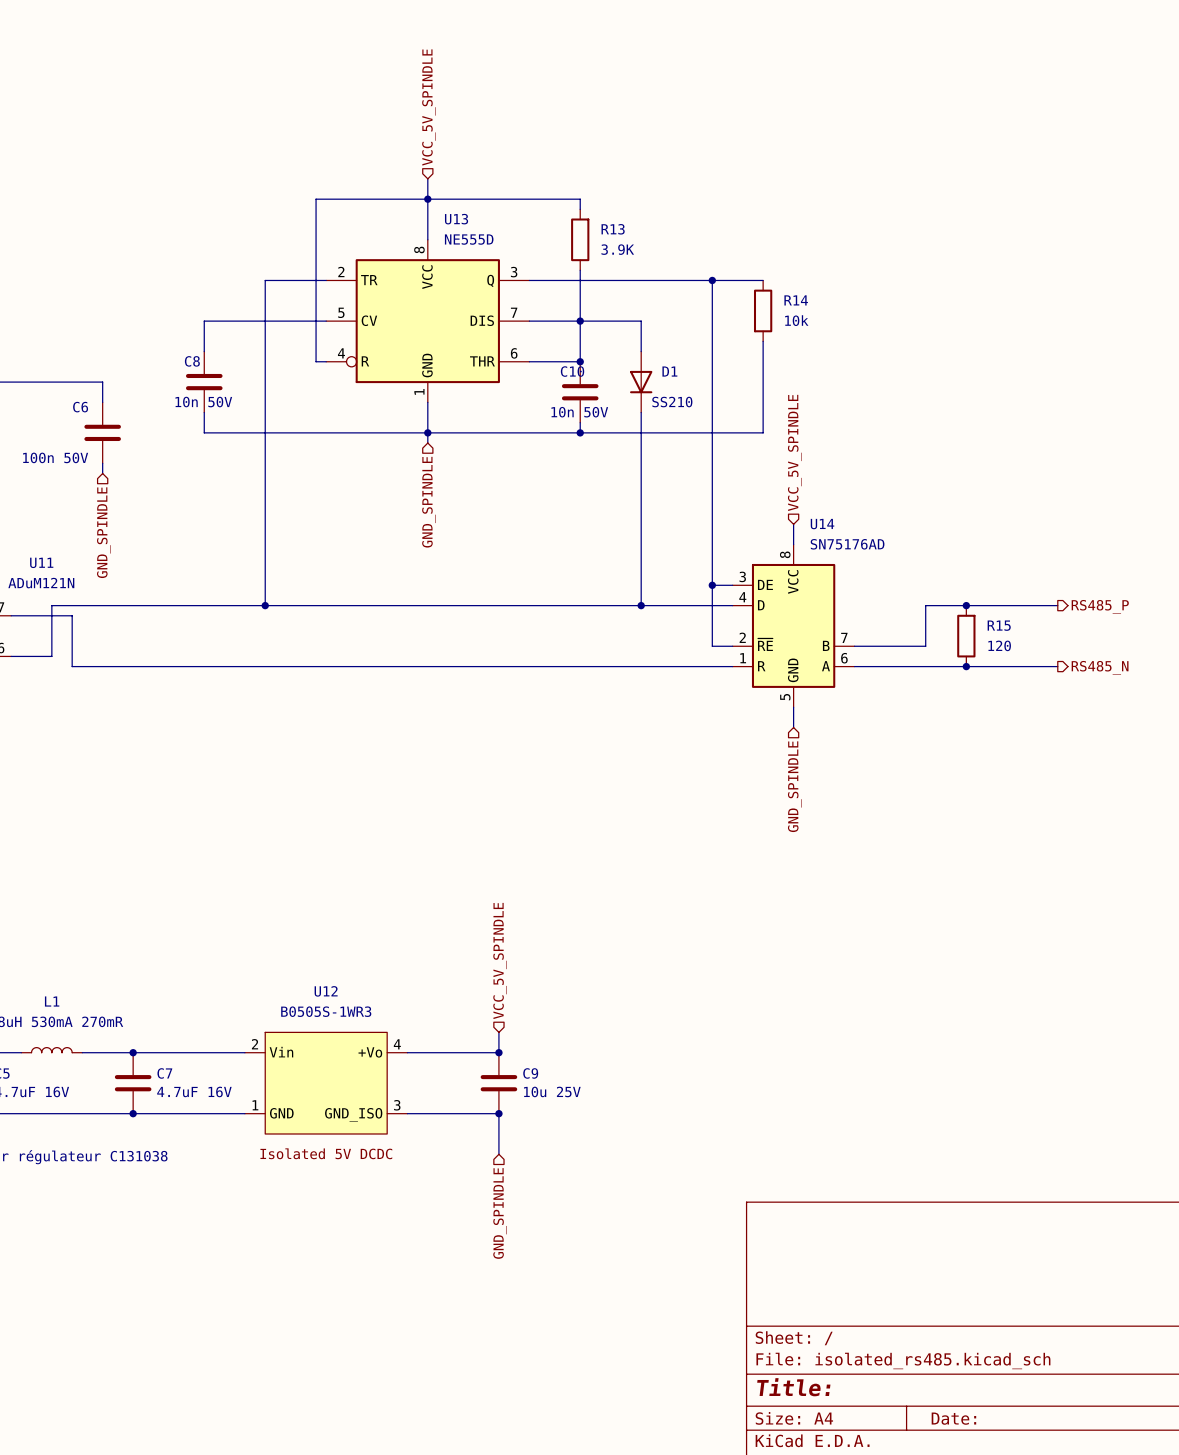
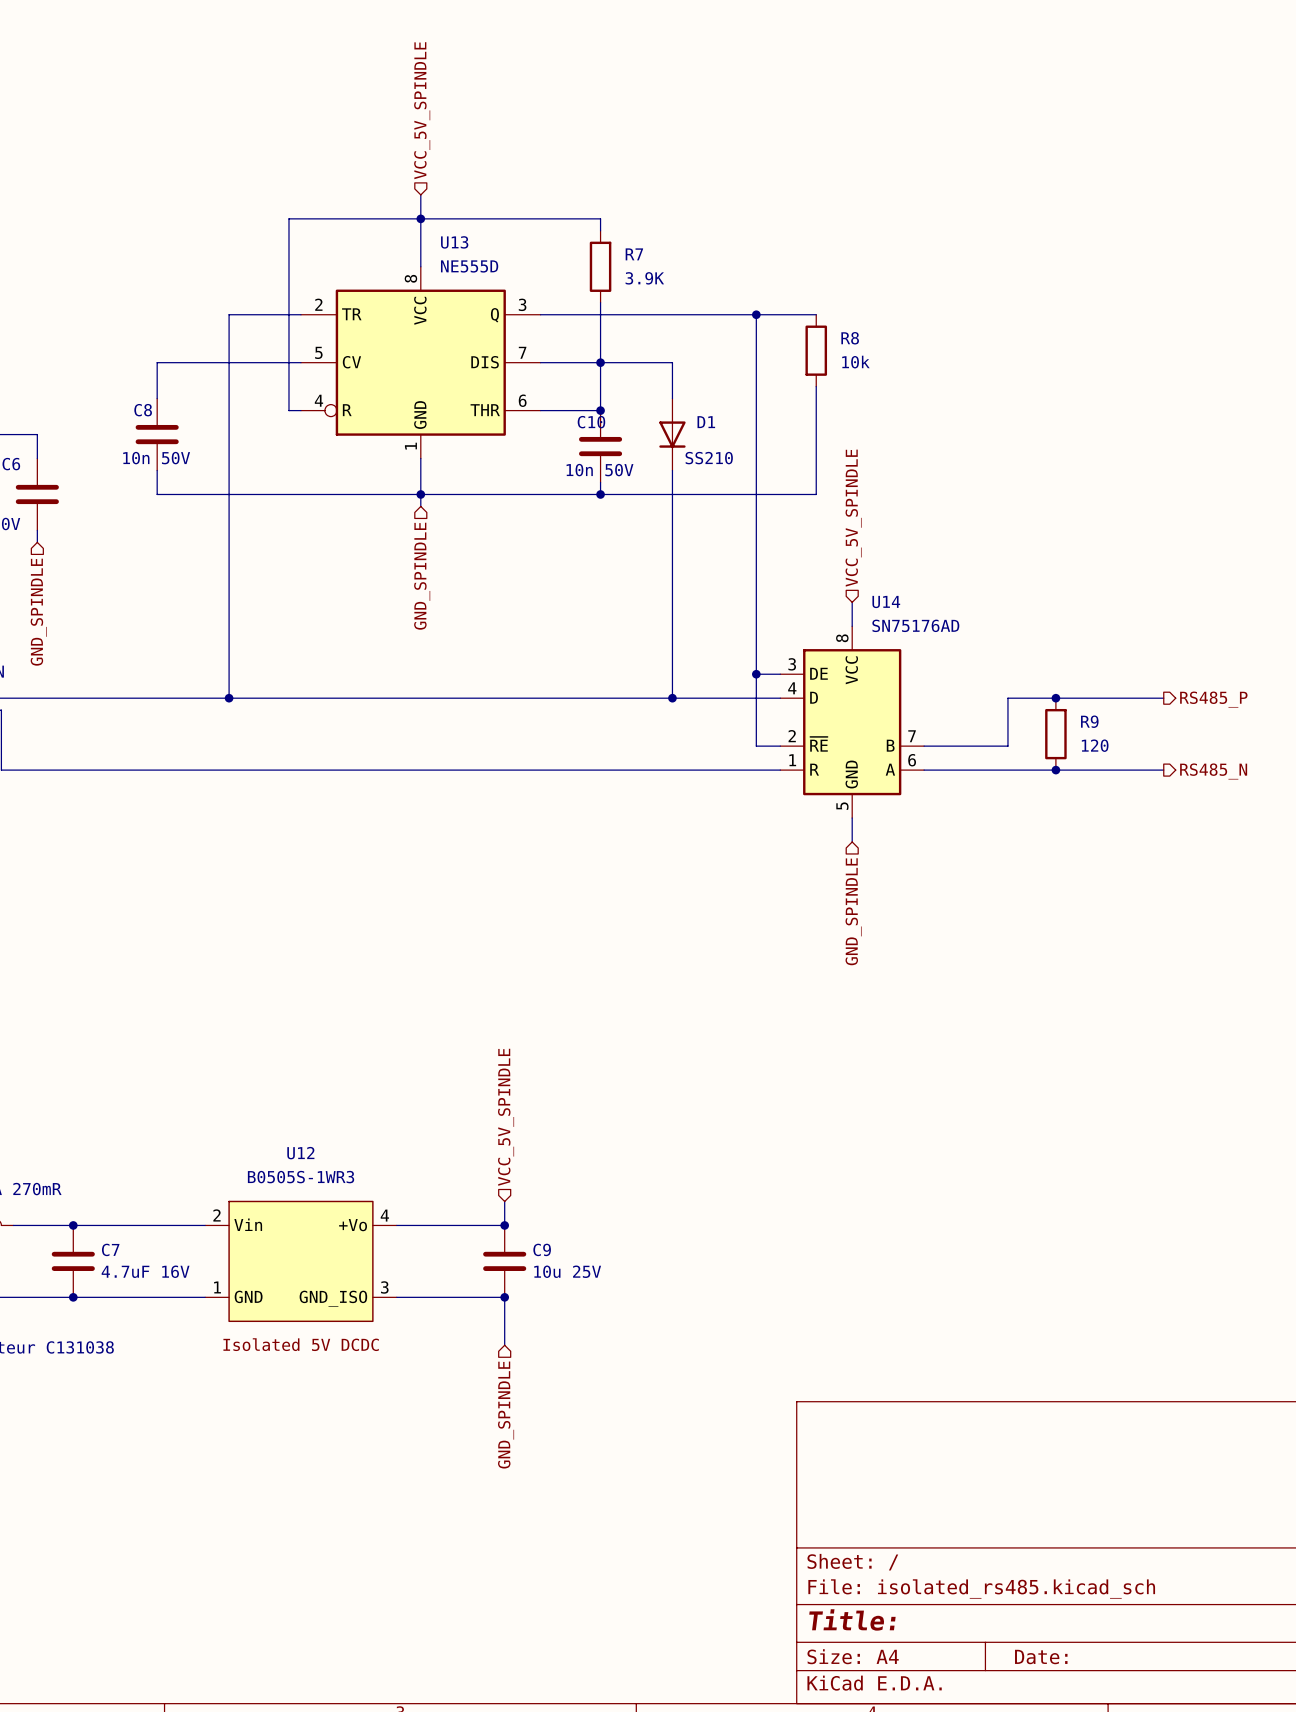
R13 name: R13 (613, 229) -> R7 (634, 254)
R14 name: R14 (796, 300) -> R8 (850, 338)
R15 name: R15 (999, 625) -> R9 (1089, 721)

